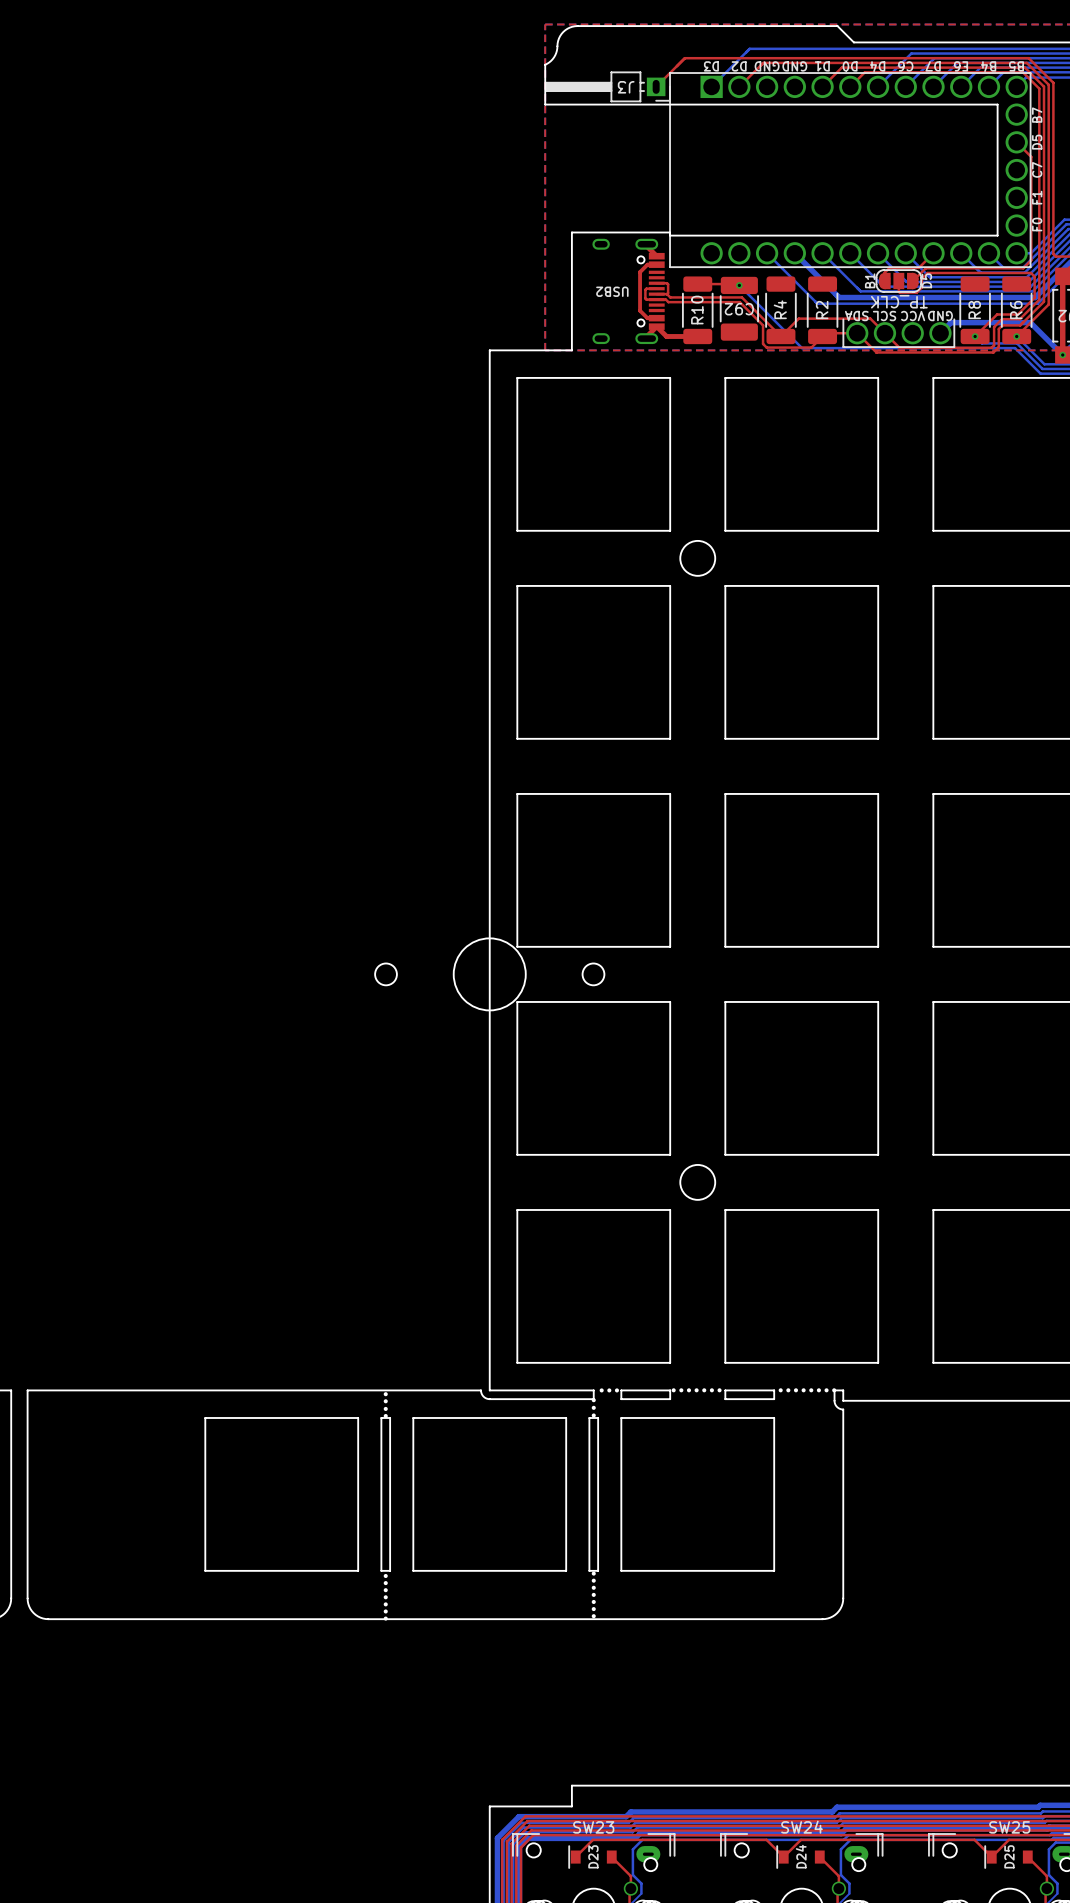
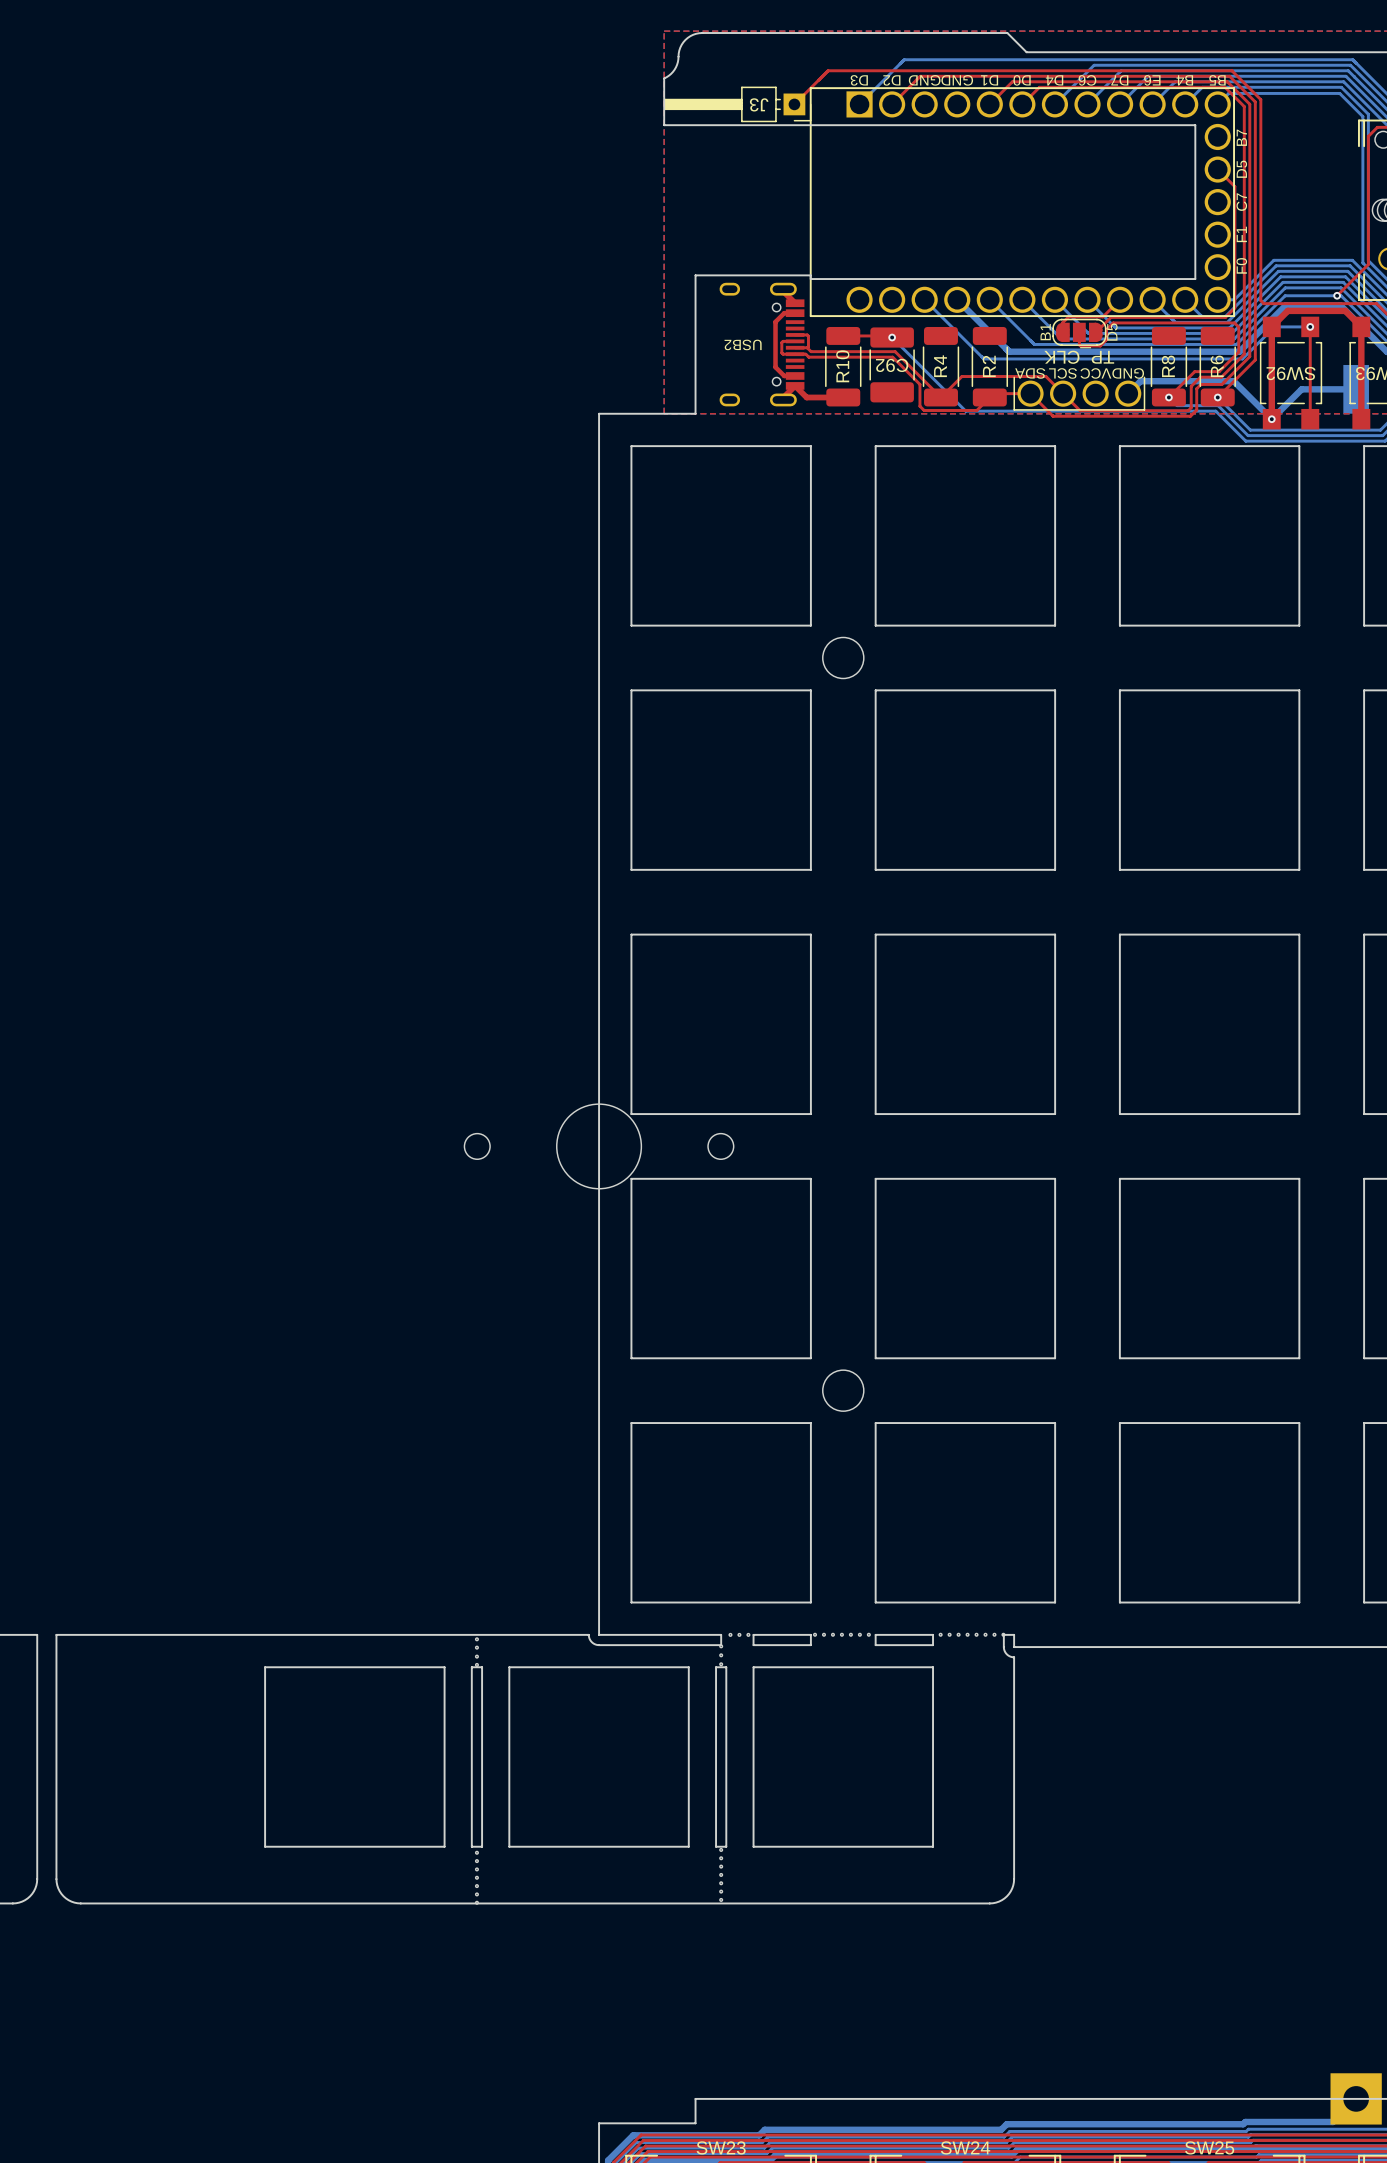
J3 footprint: [545, 71, 671, 103] -> [664, 86, 812, 123]

